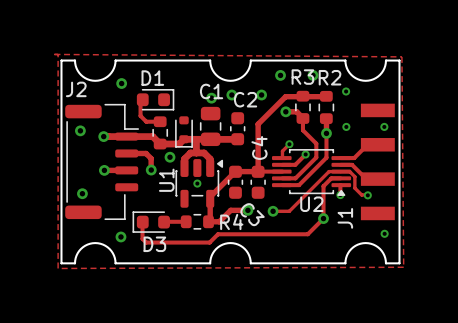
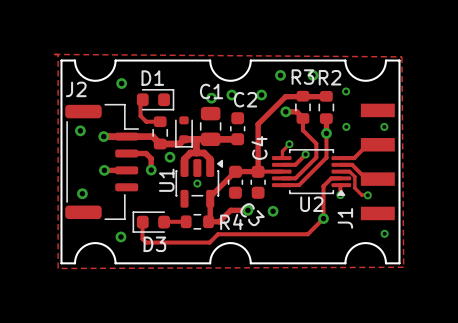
track: (340, 171) (329, 171) (289, 211) (273, 211) -> none

